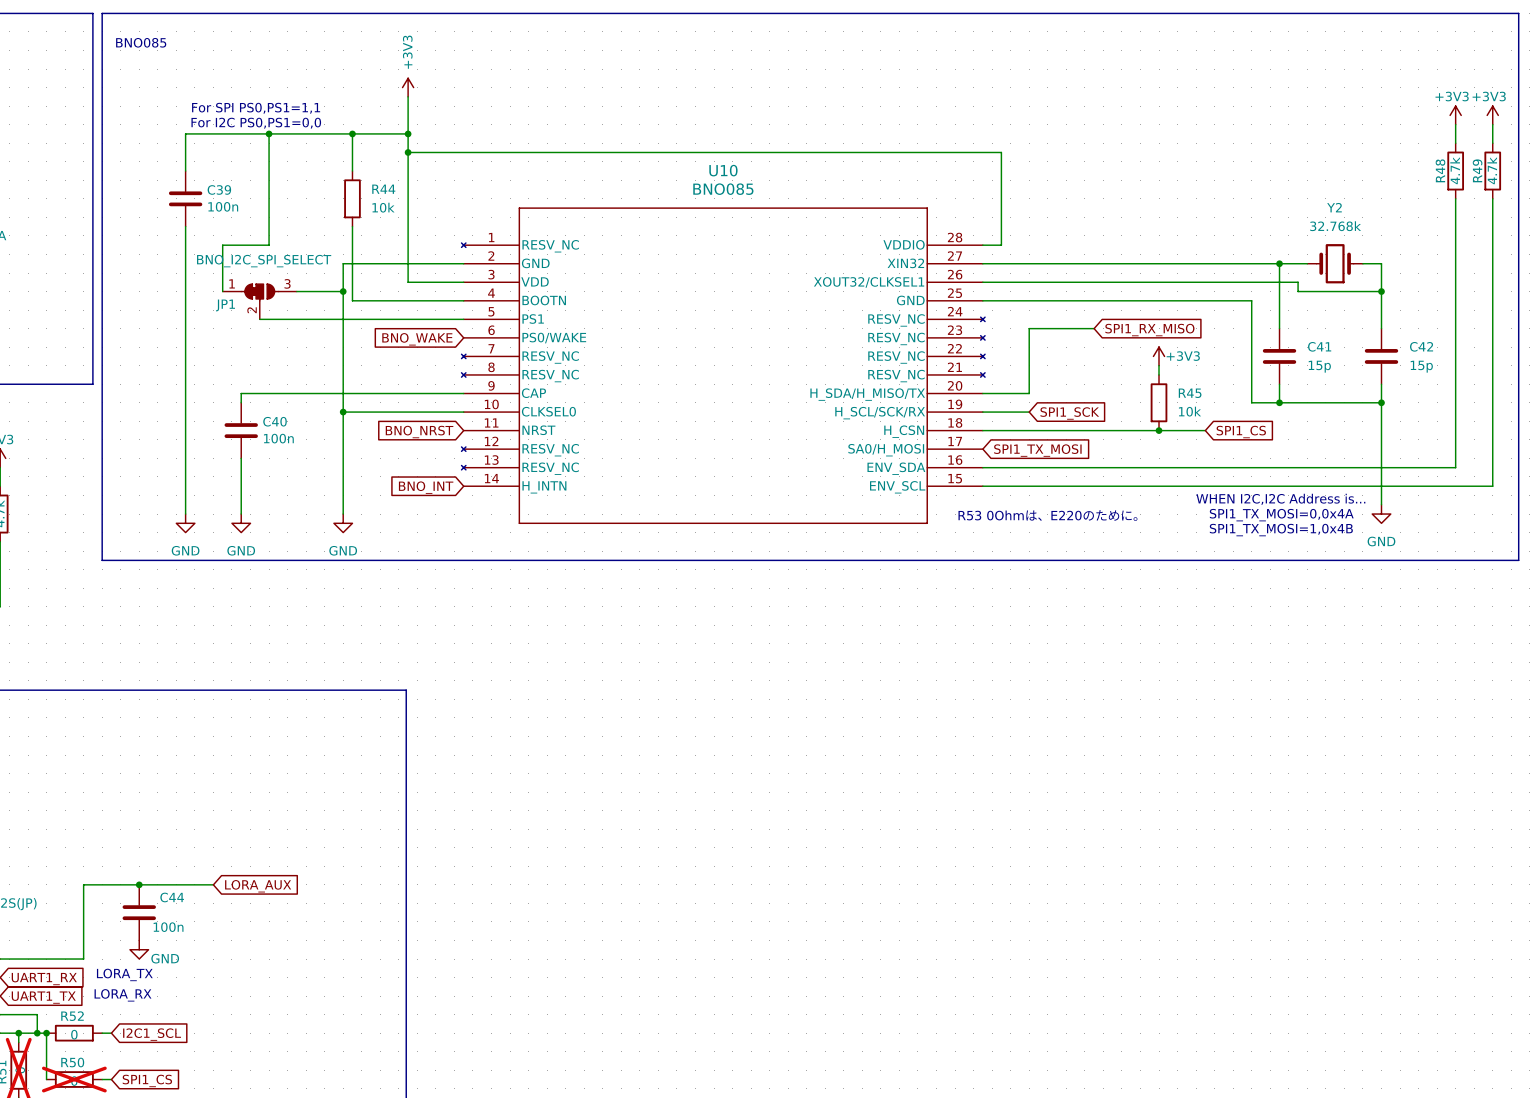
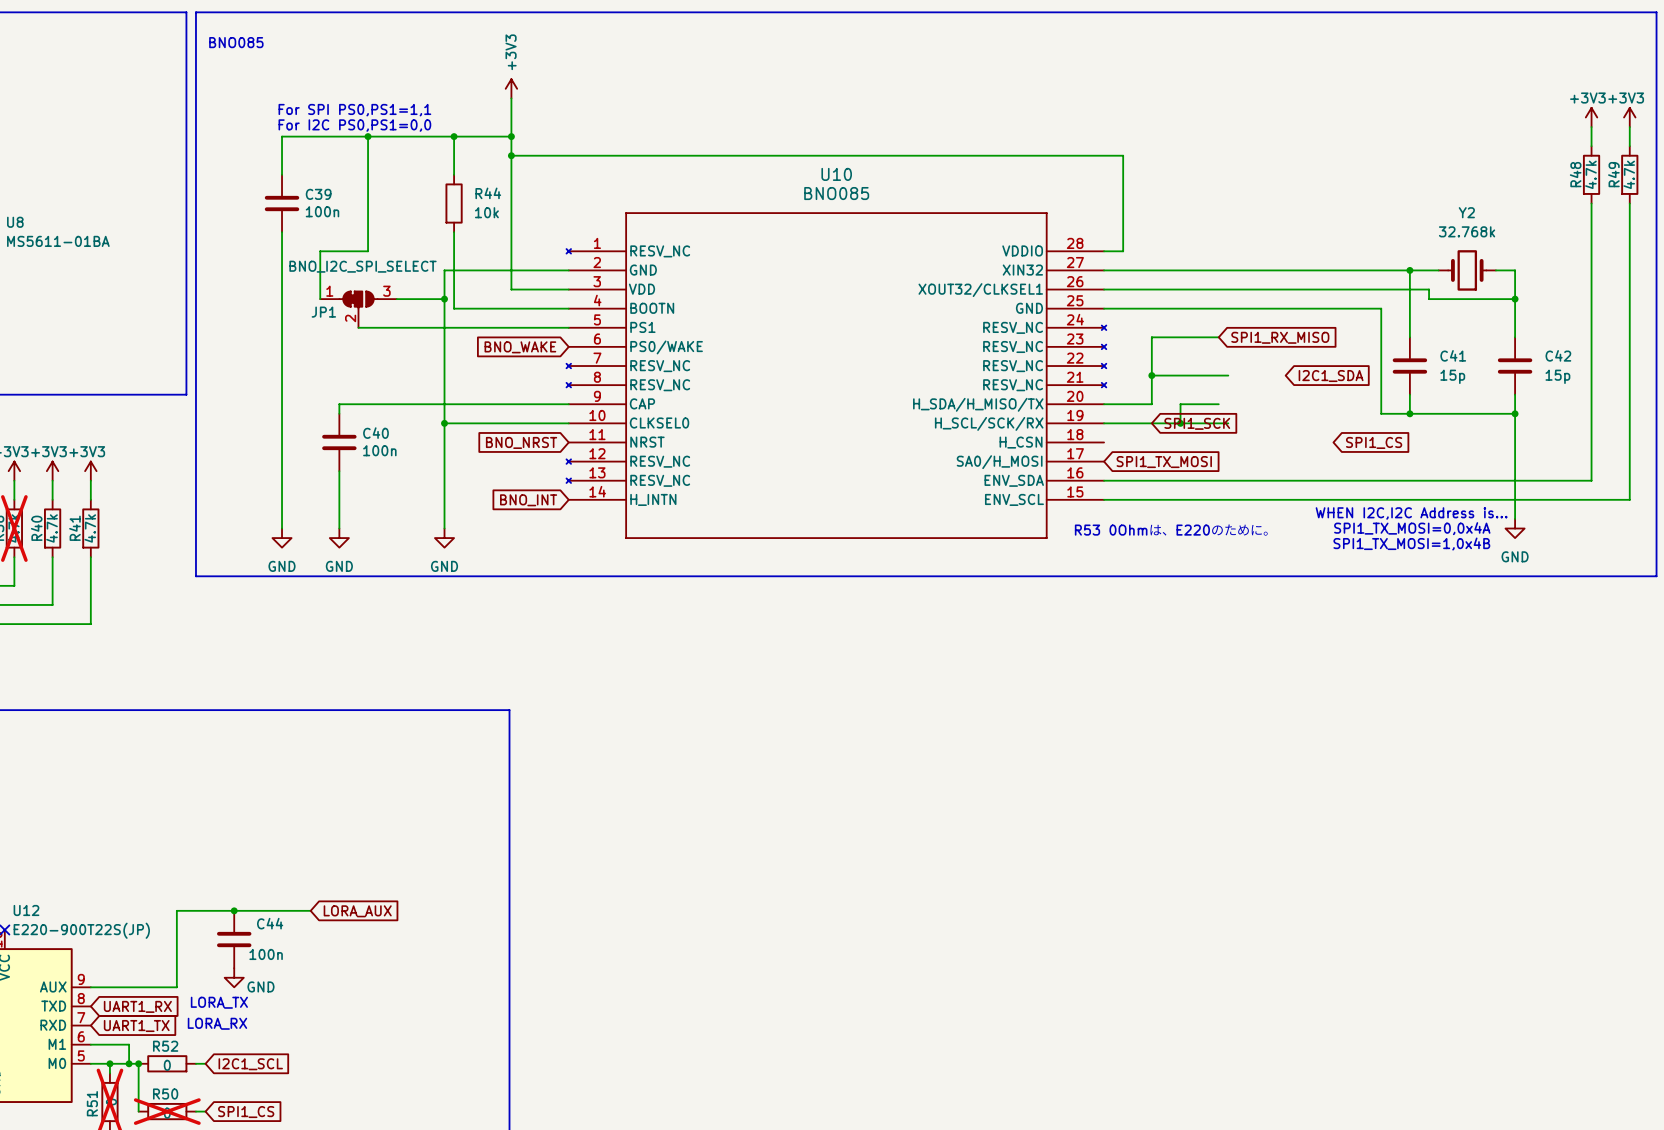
power symbol: +3V3 (1159, 356) -> none
wire: none -> (1151, 375) (1228, 375)
junction: none -> (1151, 375)
wire: (1159, 365) (1159, 374) -> none
global label: none -> I2C1_SDA (1331, 376)
wire: none -> (1218, 404) (1180, 404) (1180, 423)
R45: 10k (1159, 402) -> none
wire: none -> (1151, 423) (1228, 423)
junction: none -> (1180, 423)
wire: (982, 430) (1205, 430) -> none
junction: (1159, 430) -> none

